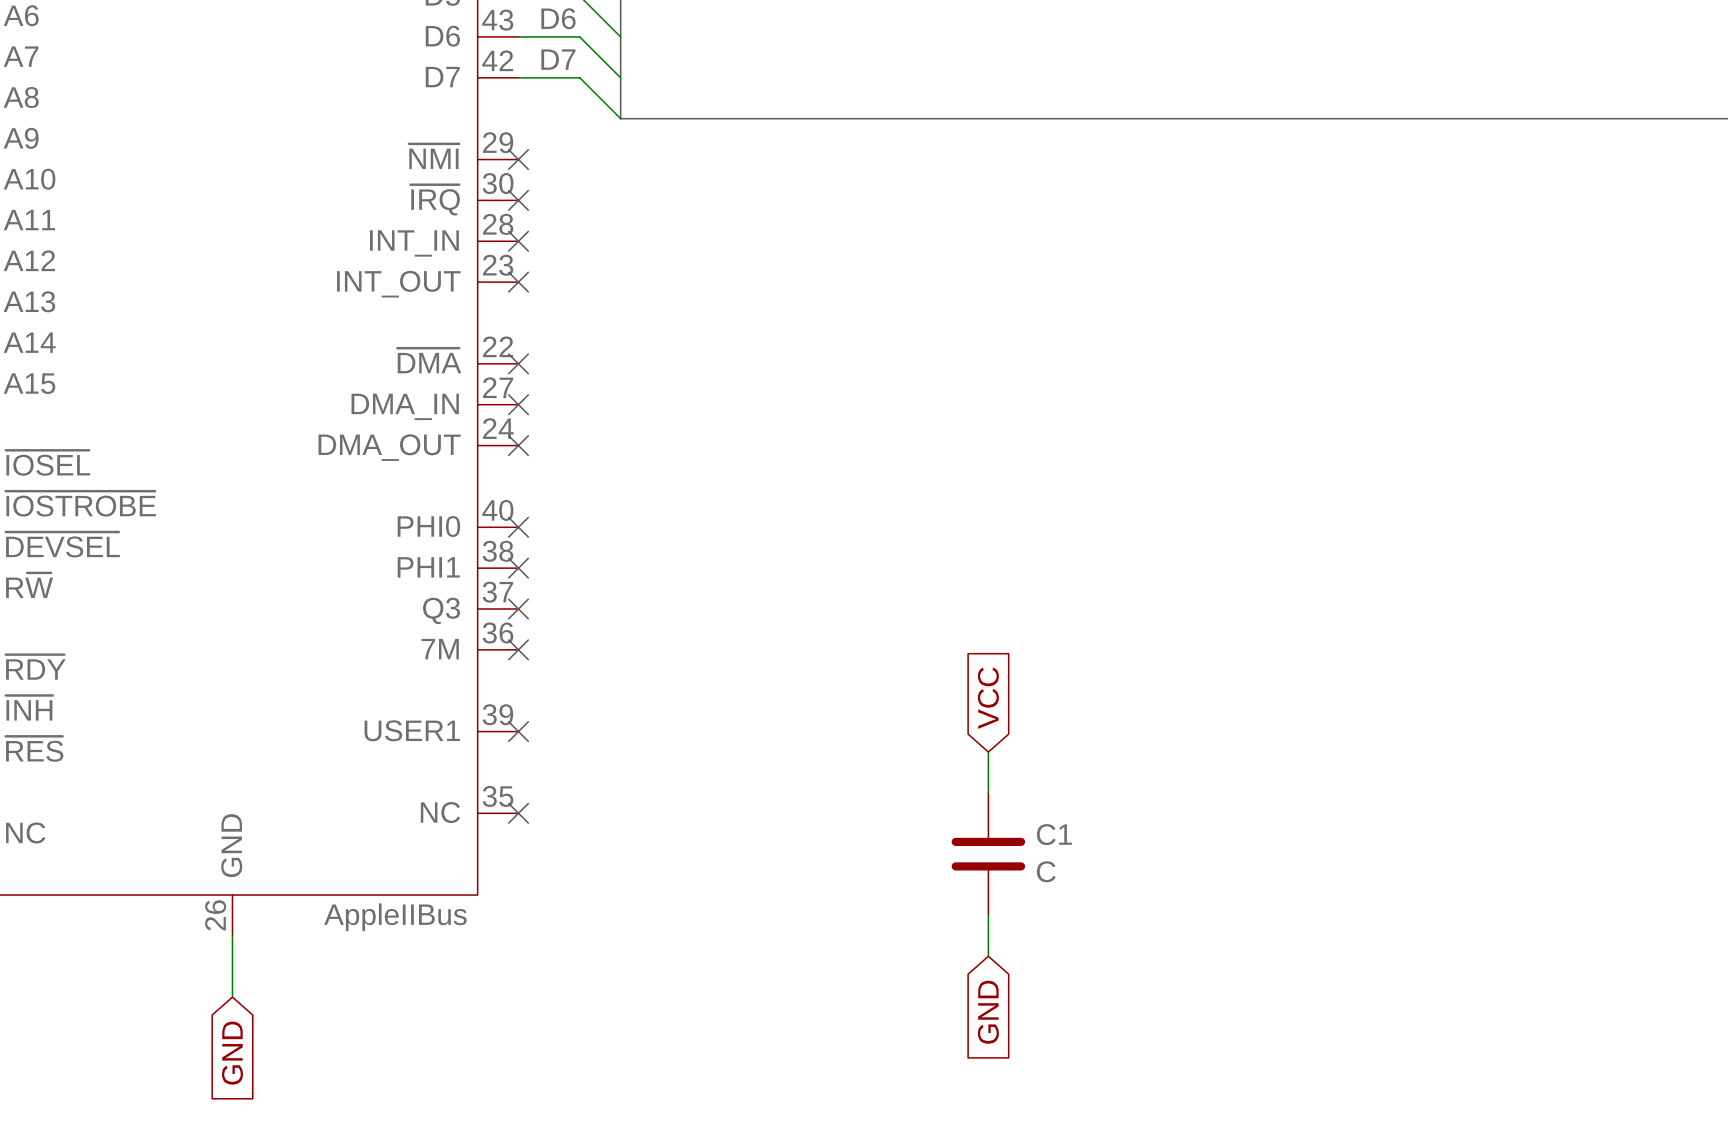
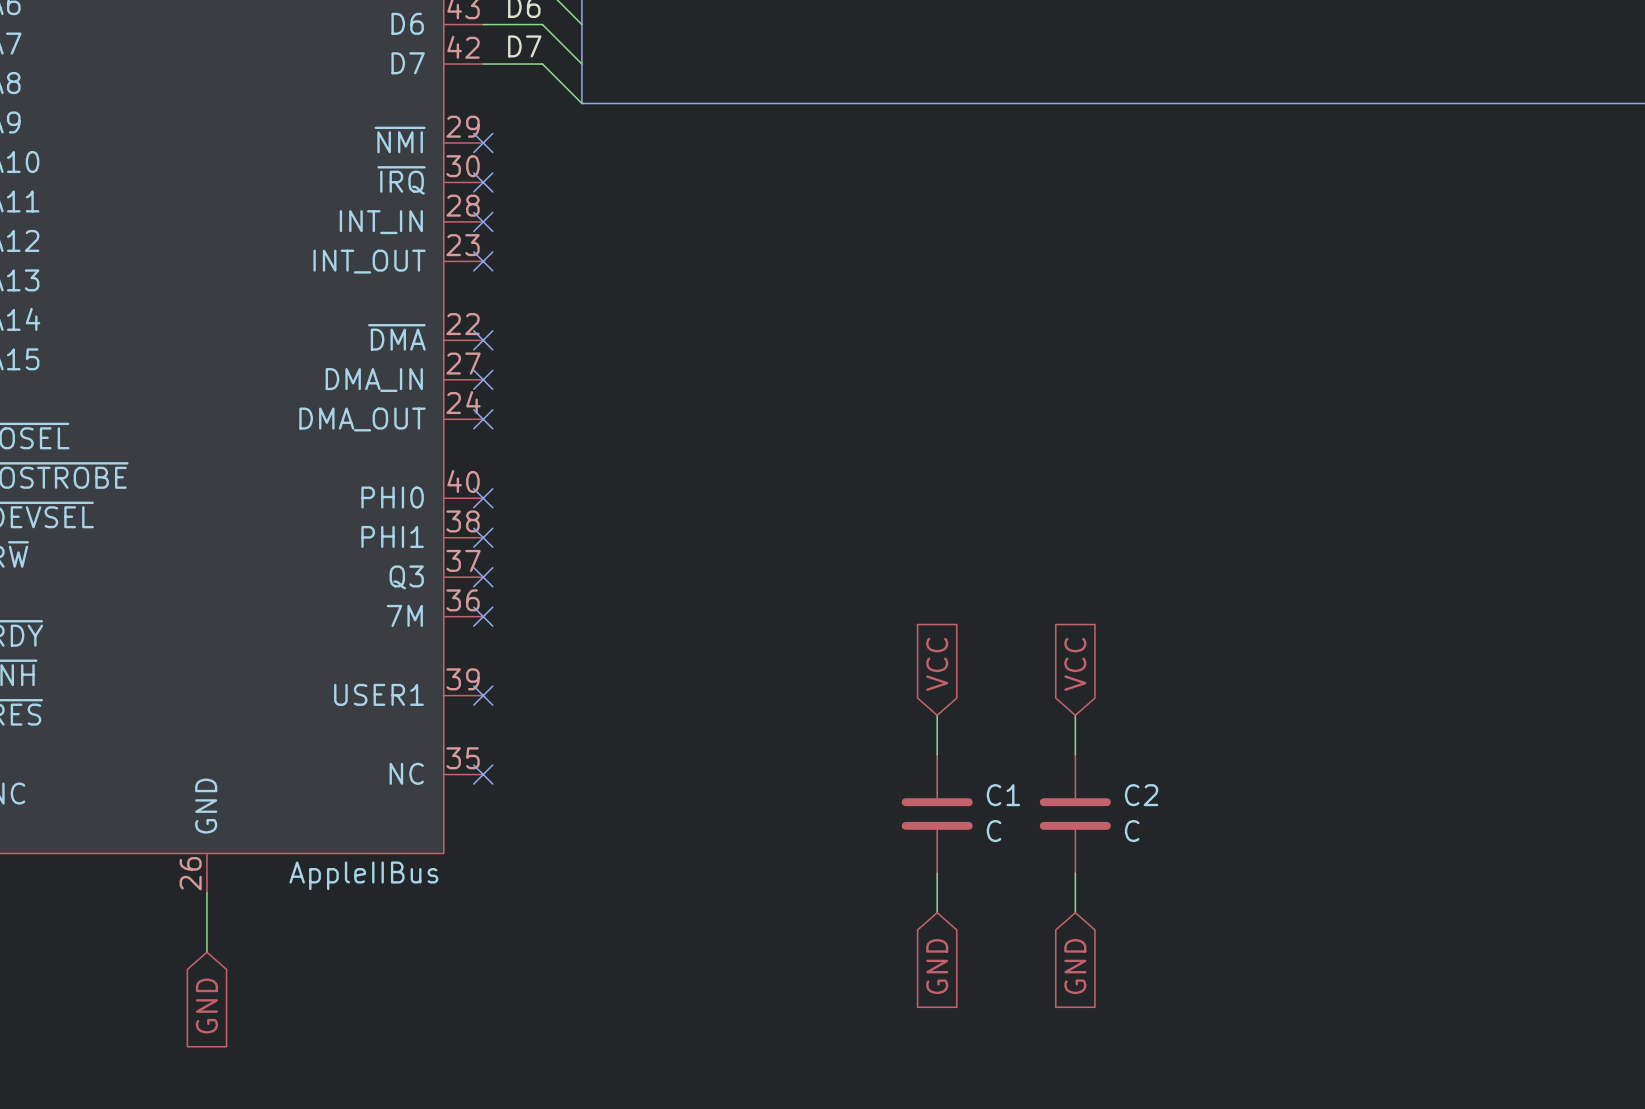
global label: none -> VCC (1075, 664)
wire: none -> (1075, 715) (1075, 754)
C2: none -> C (1075, 814)
wire: none -> (1075, 873) (1075, 912)
global label: none -> GND (1075, 966)

